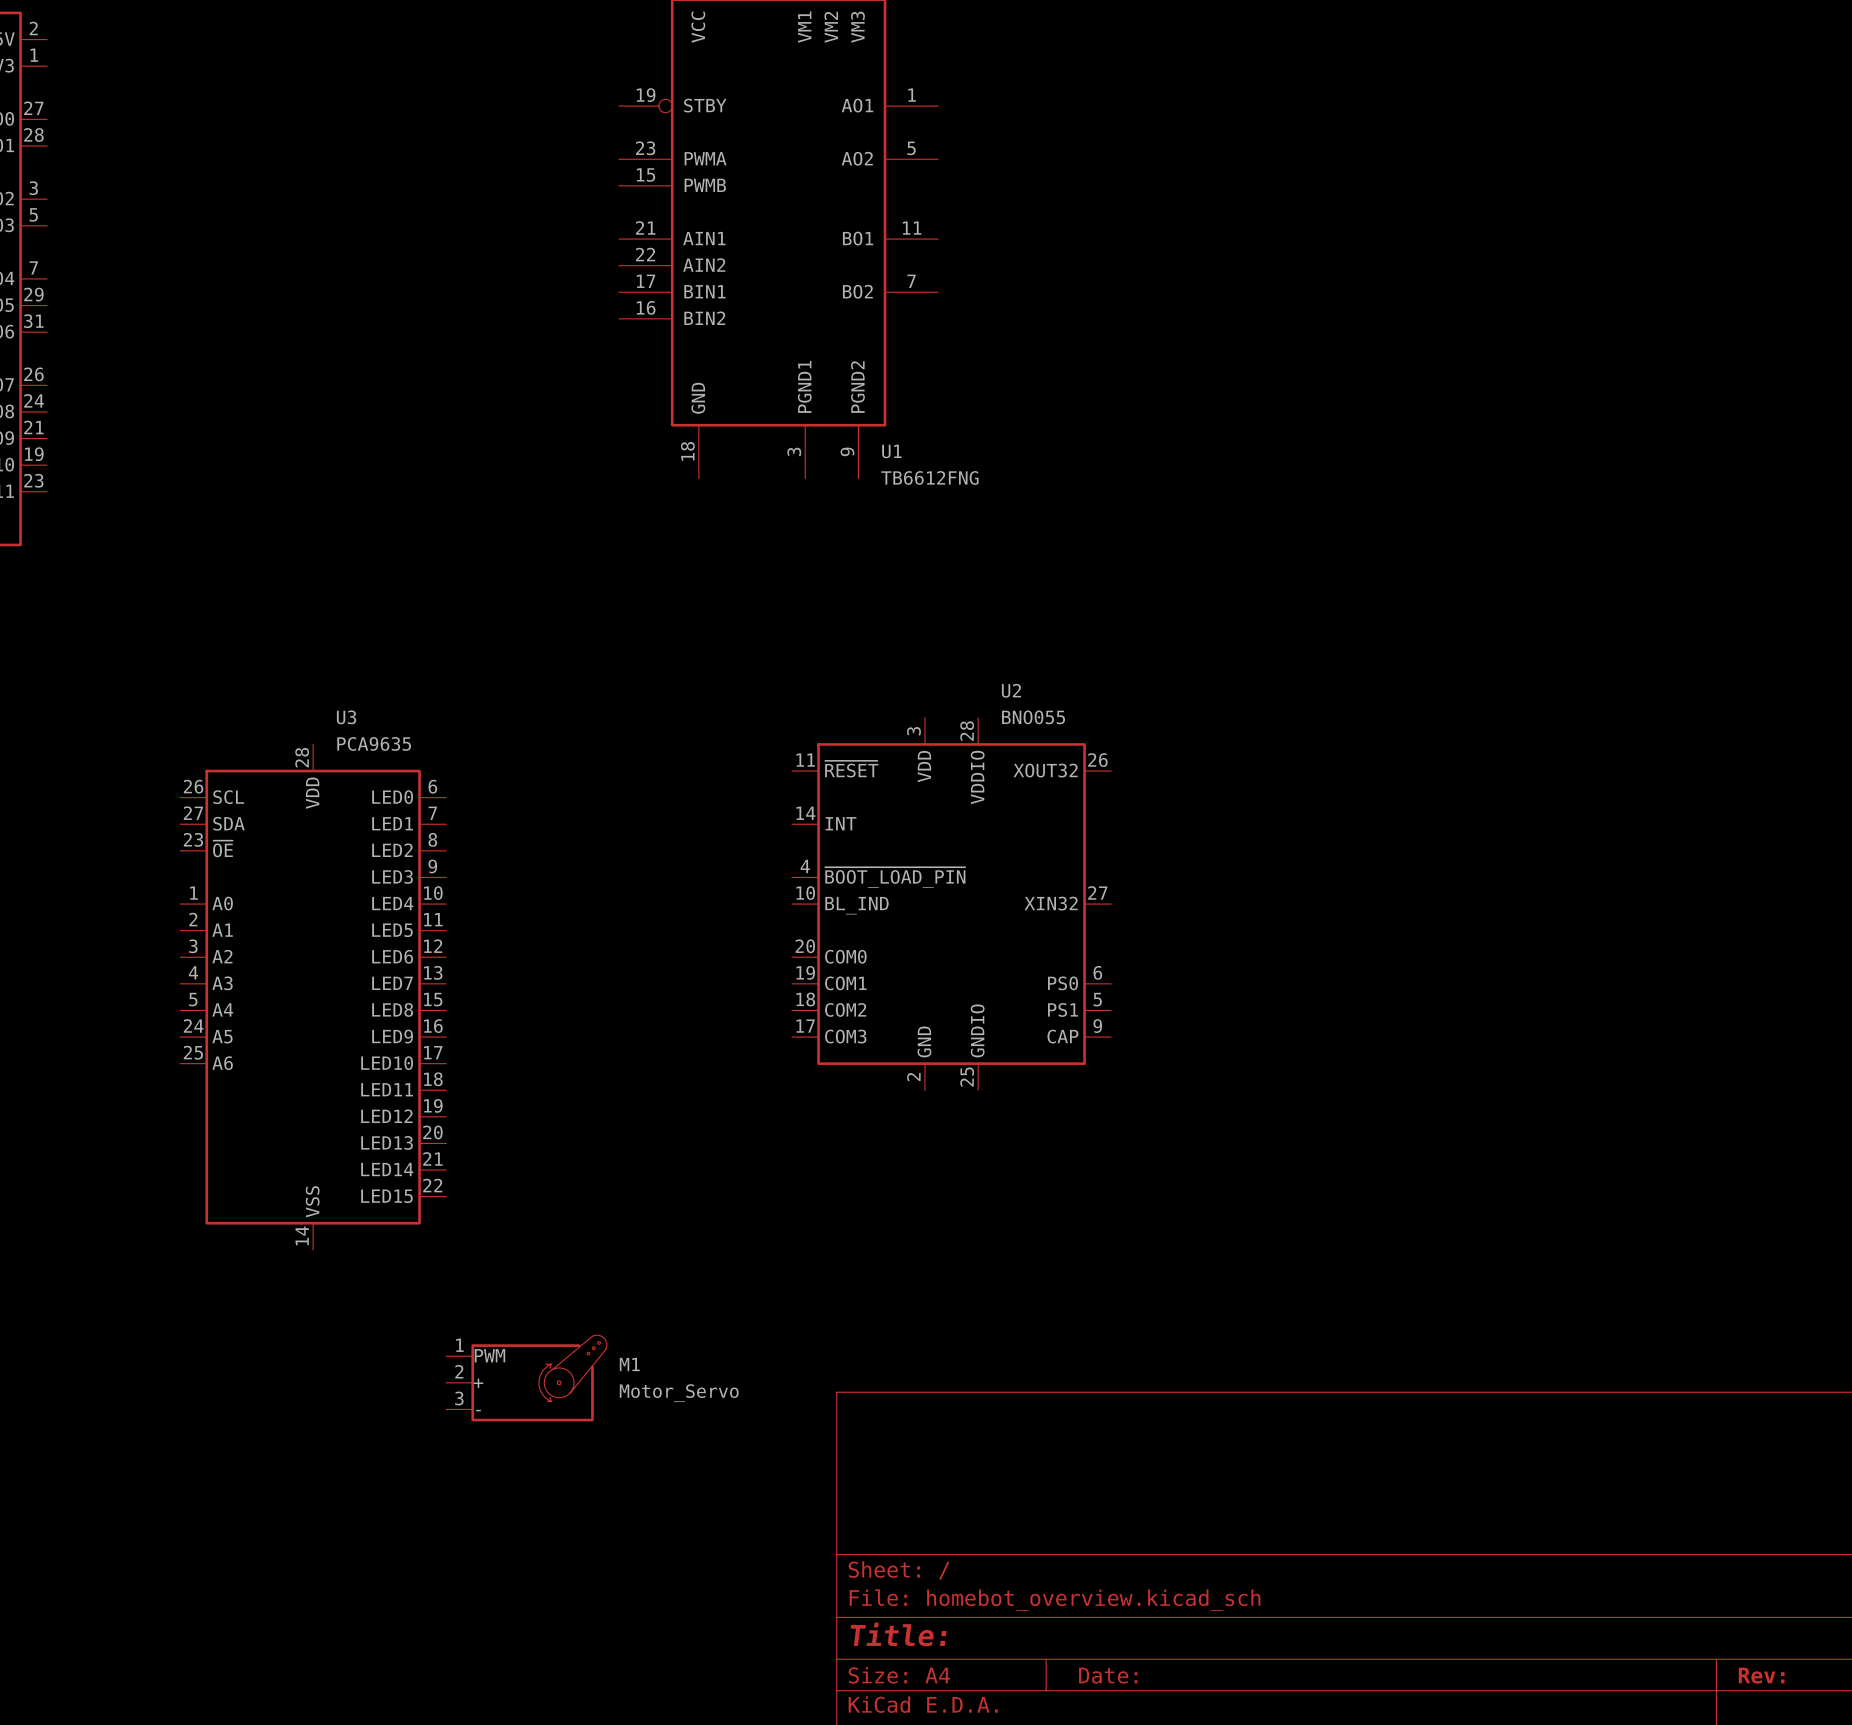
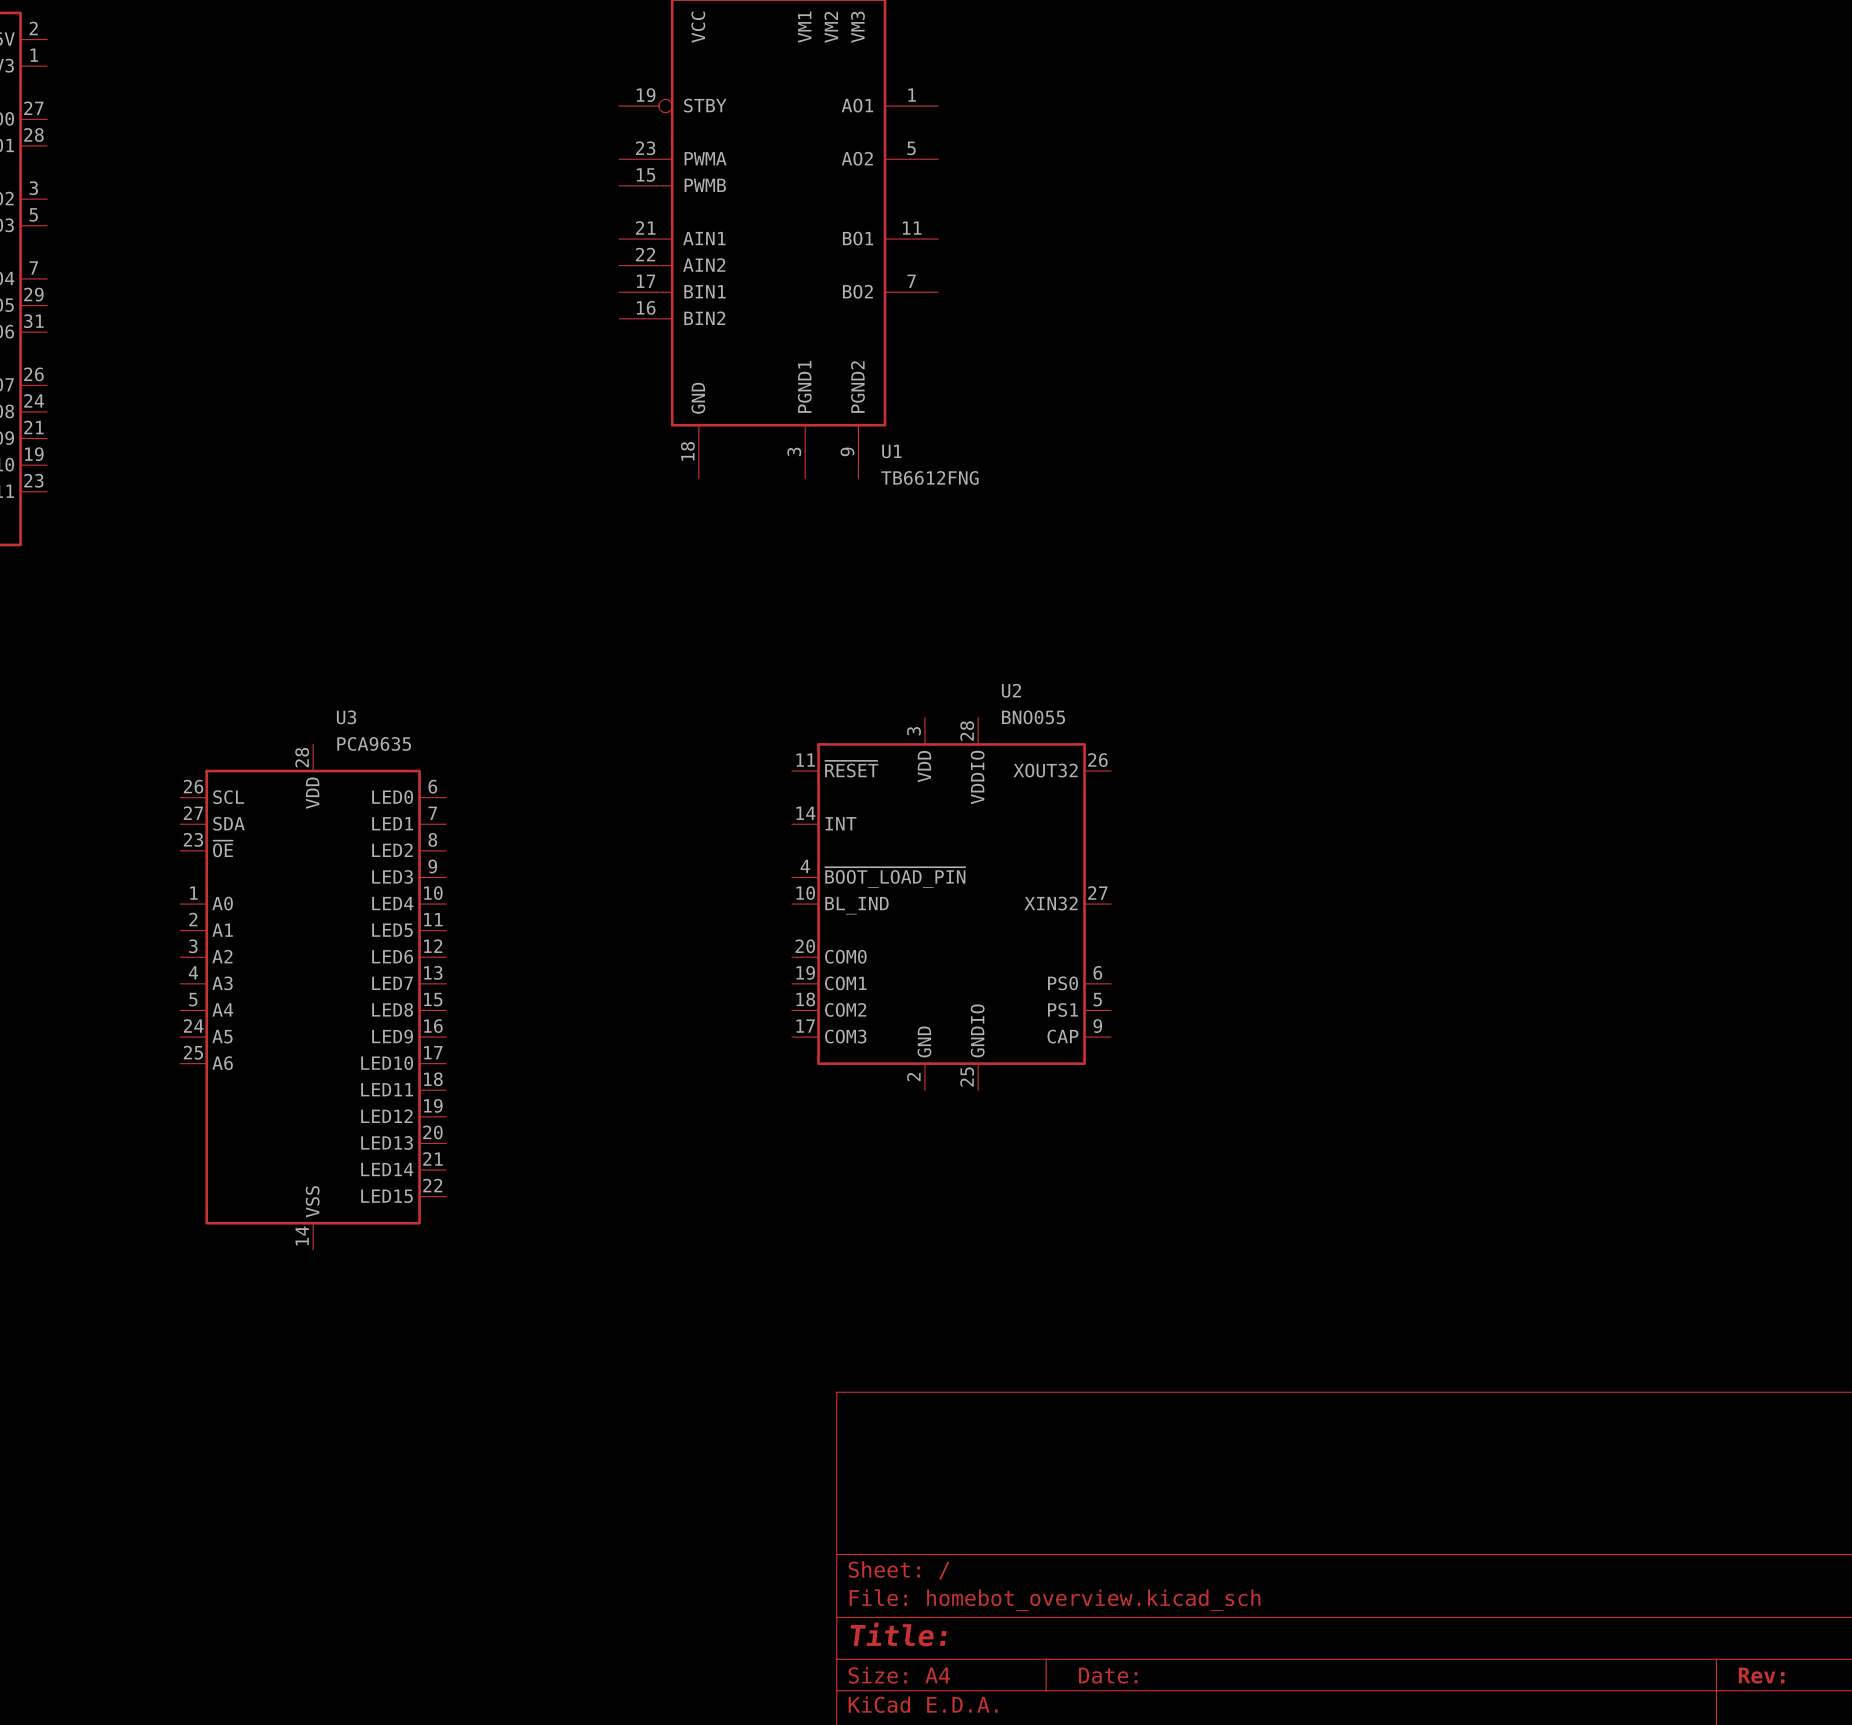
M1: Motor_Servo (526, 1378) -> none

